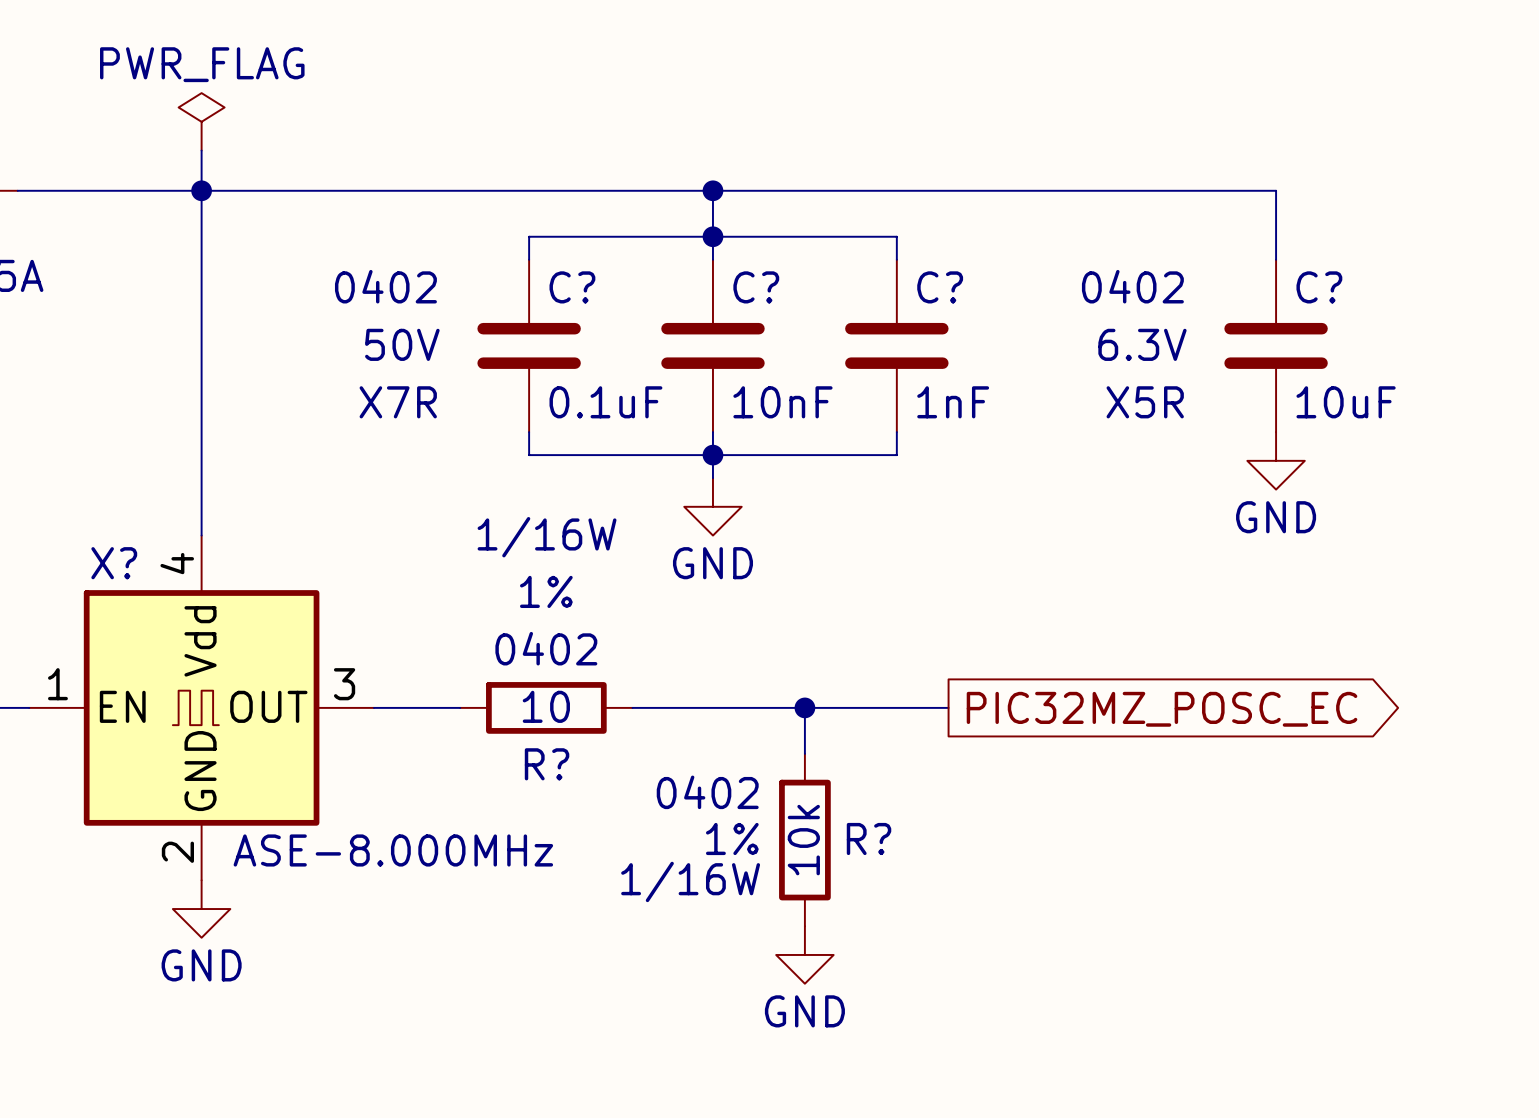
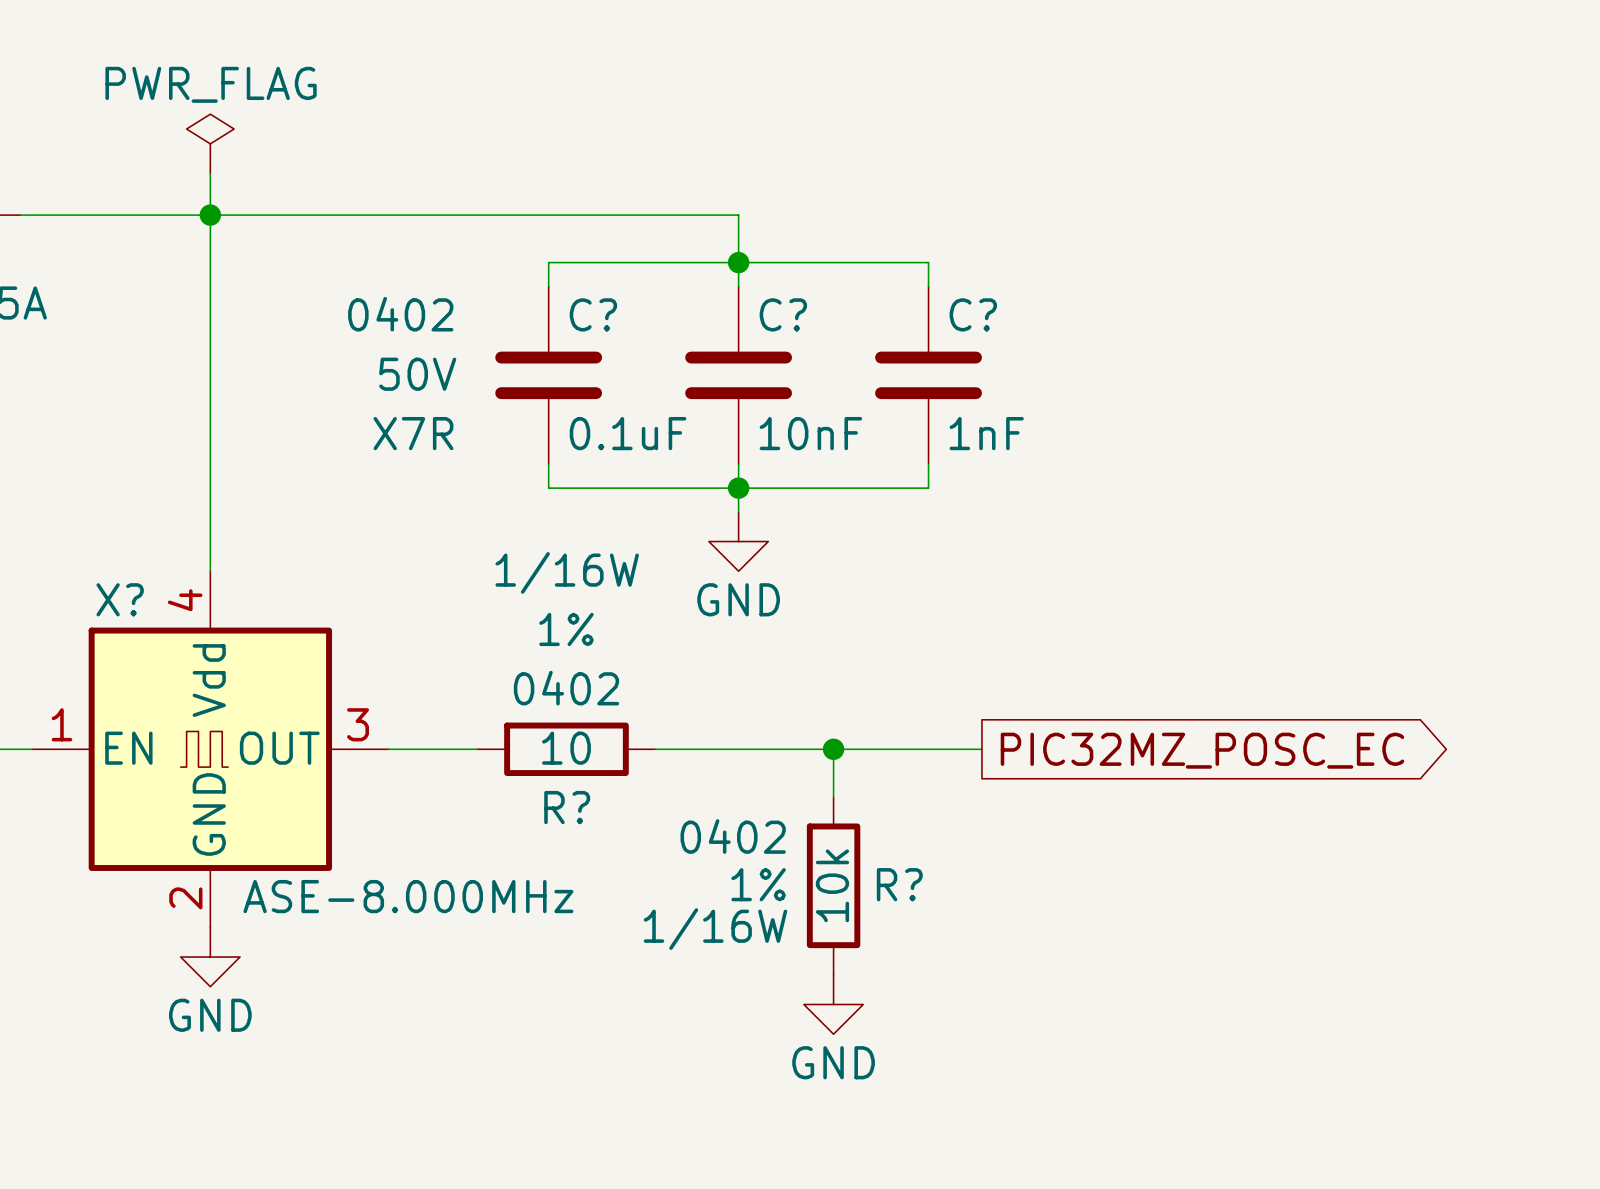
wire: (712, 190) (1276, 190) (1276, 259) -> none
junction: (712, 190) -> none
C?: 10uF (1276, 345) -> none
power symbol: GND (1276, 460) -> none

